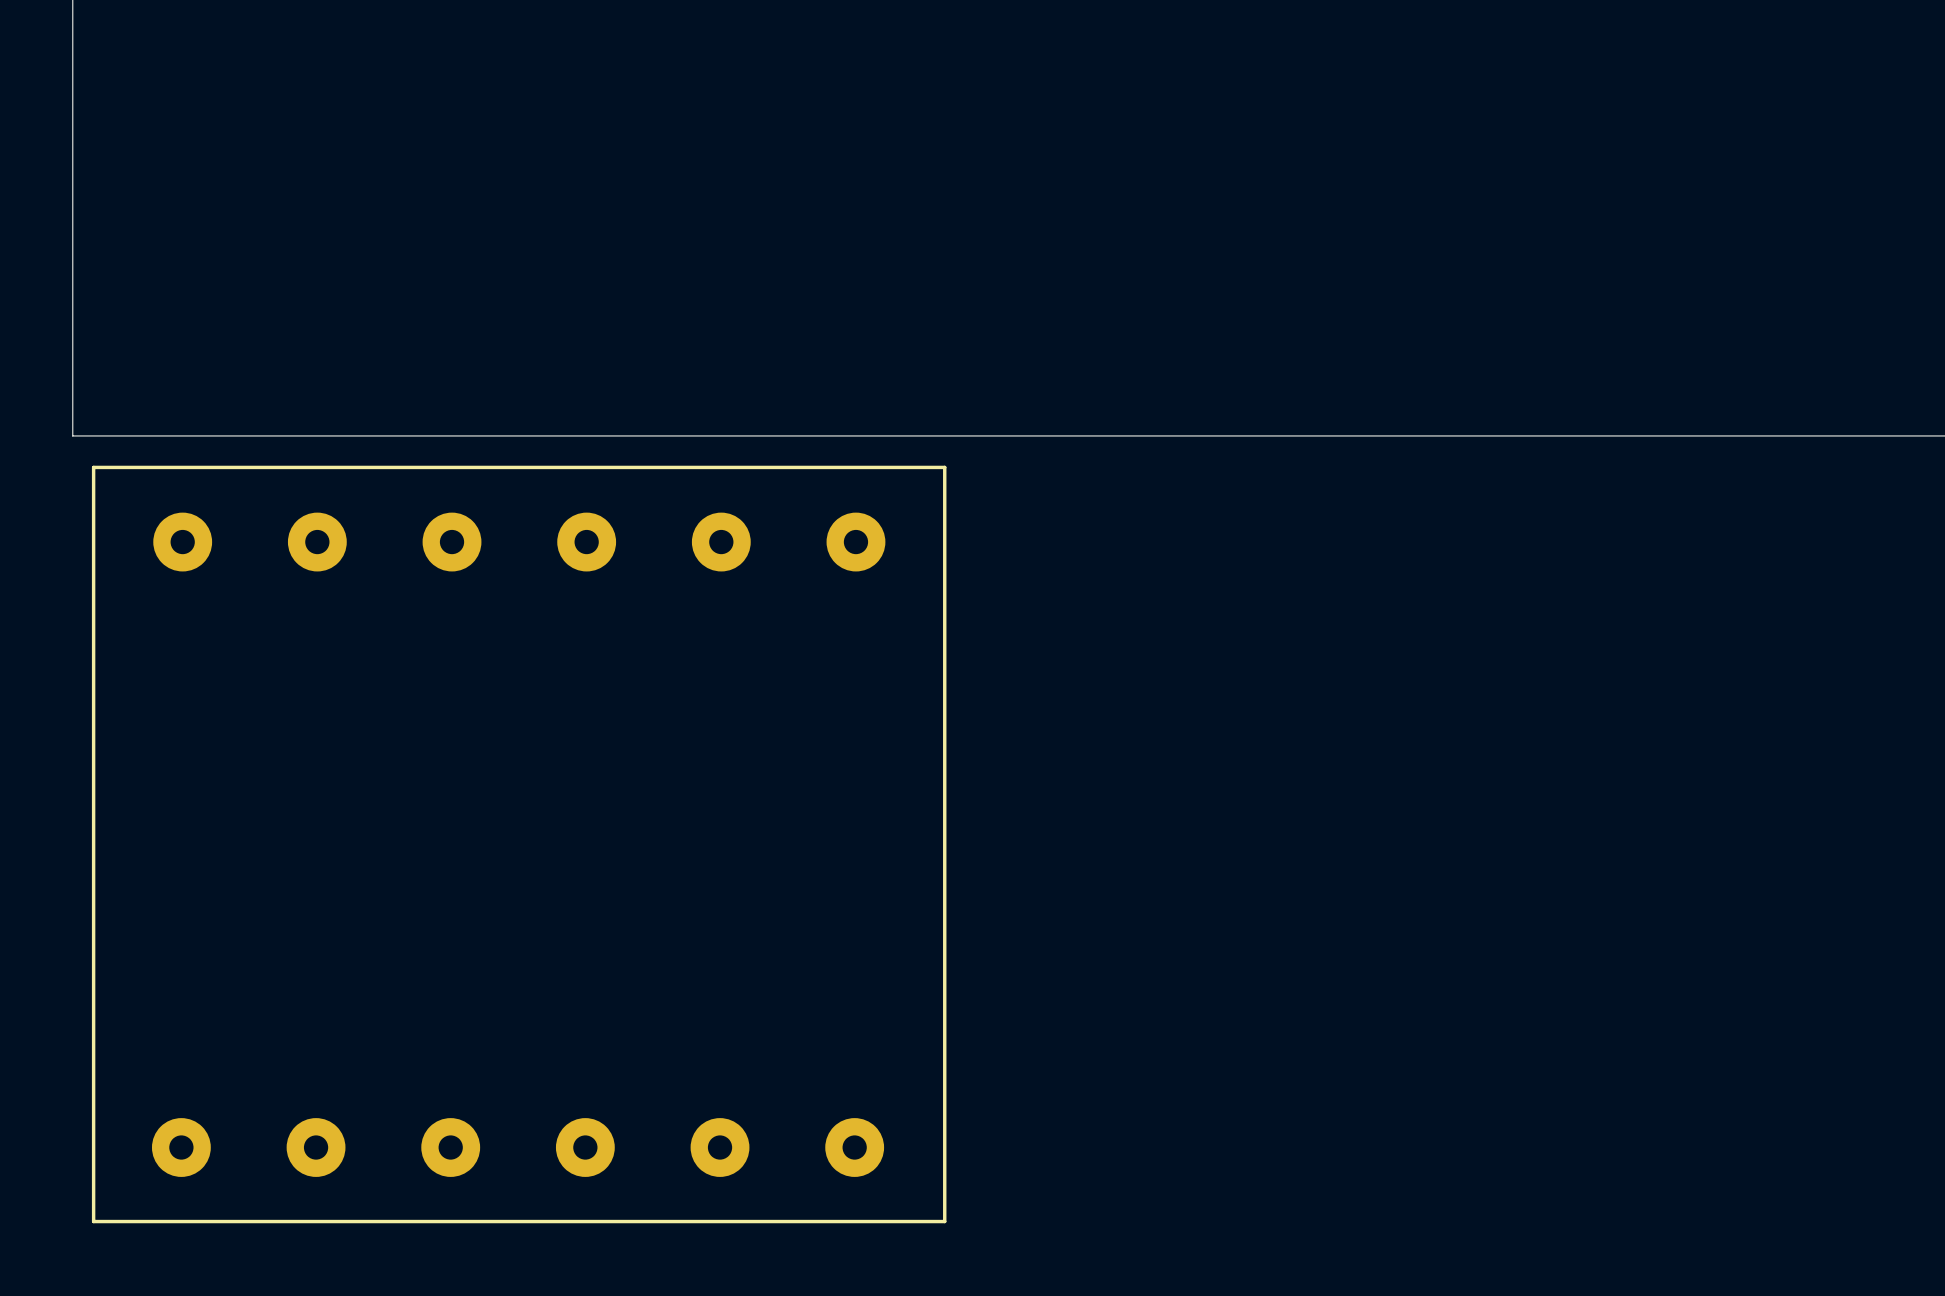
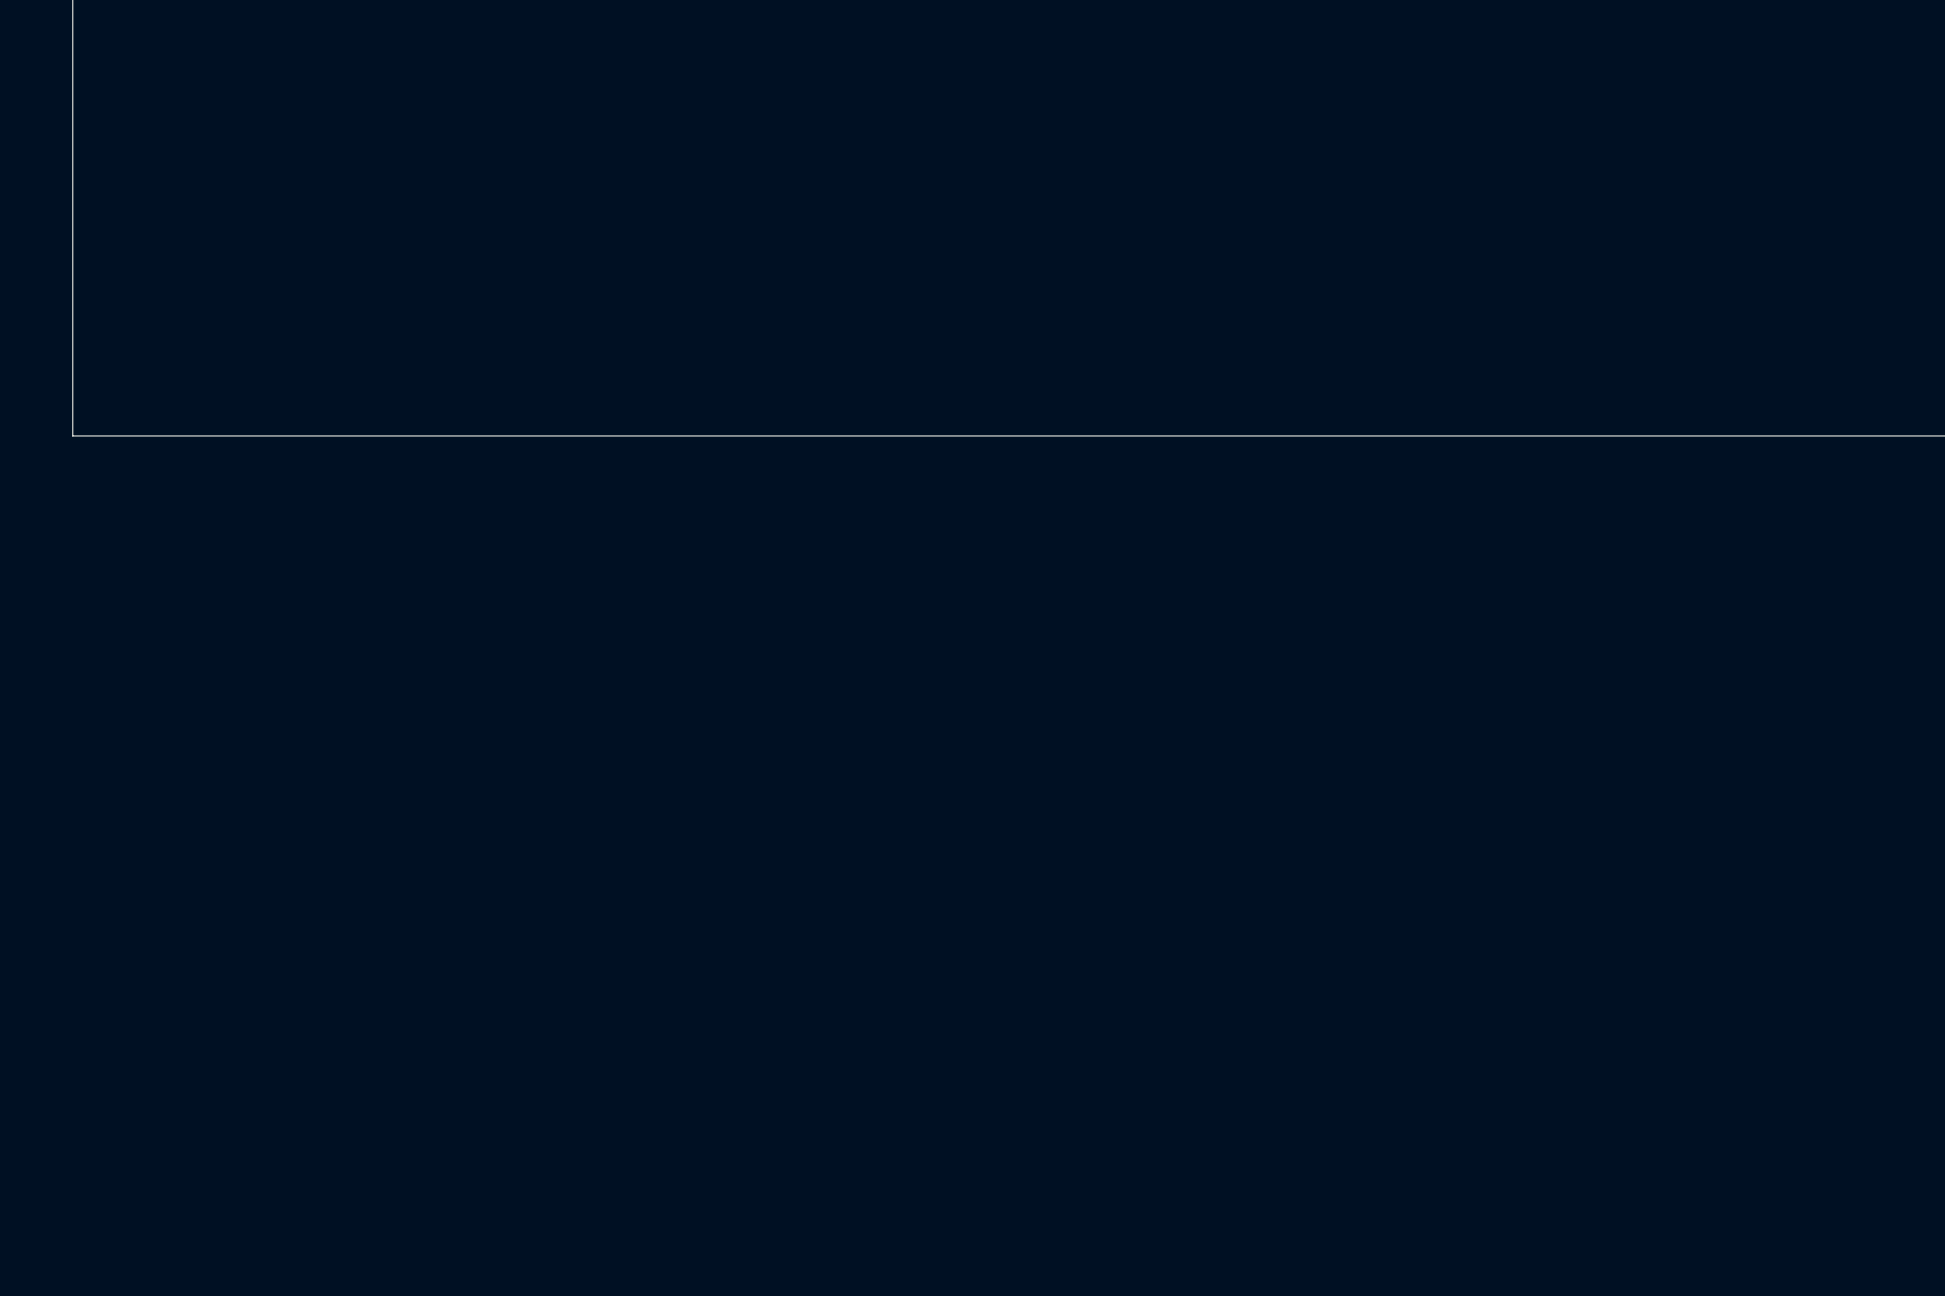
part: (519, 844) -> none

